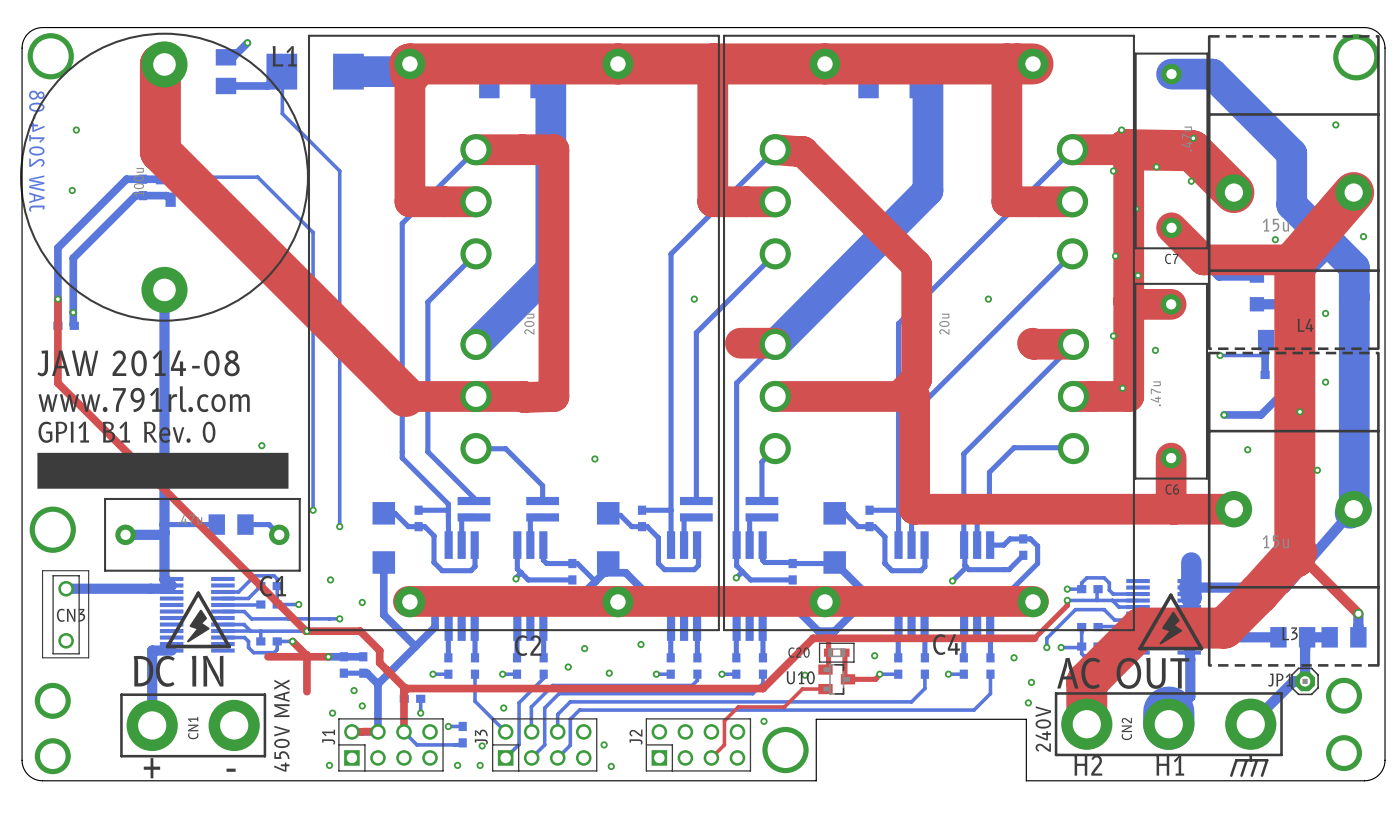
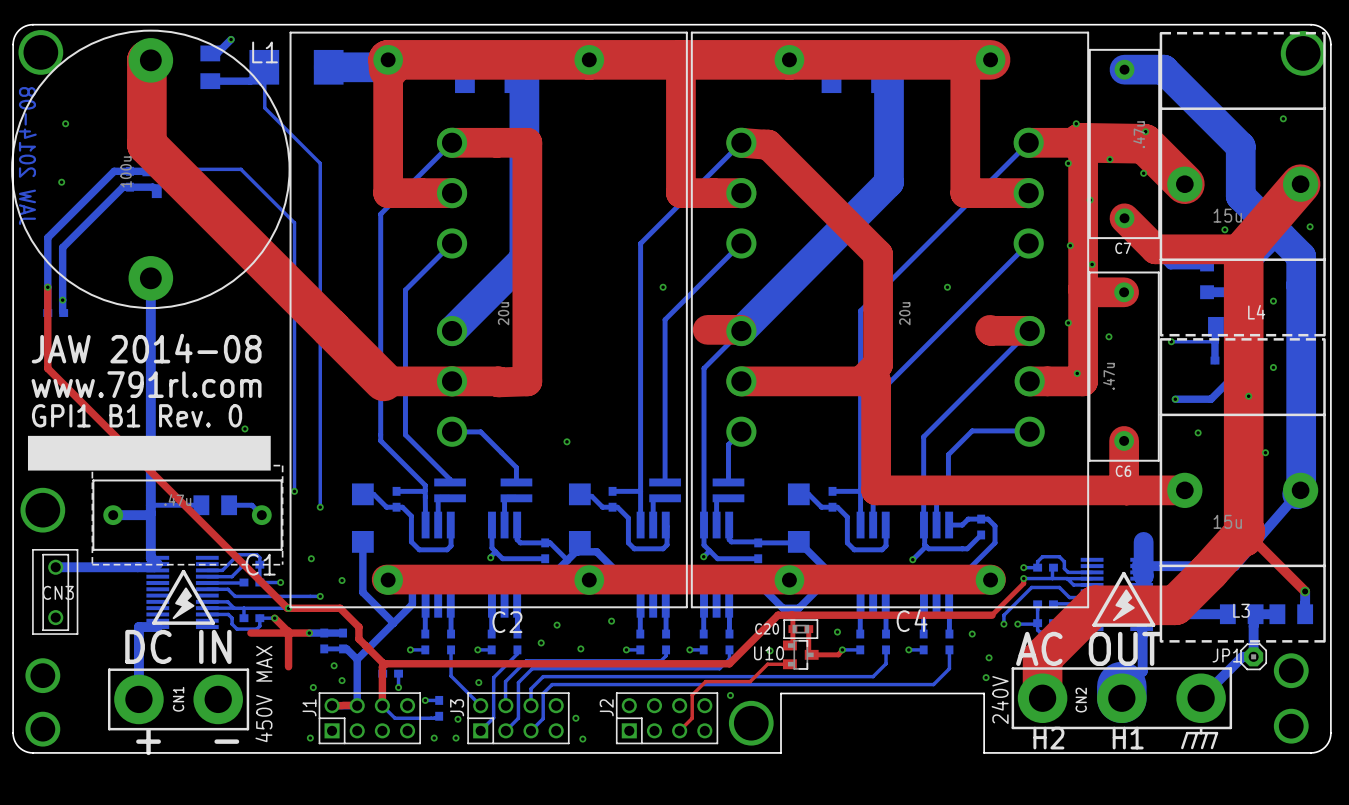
line: none -> (92, 563) (92, 465) (282, 465) (282, 564) (92, 564)

